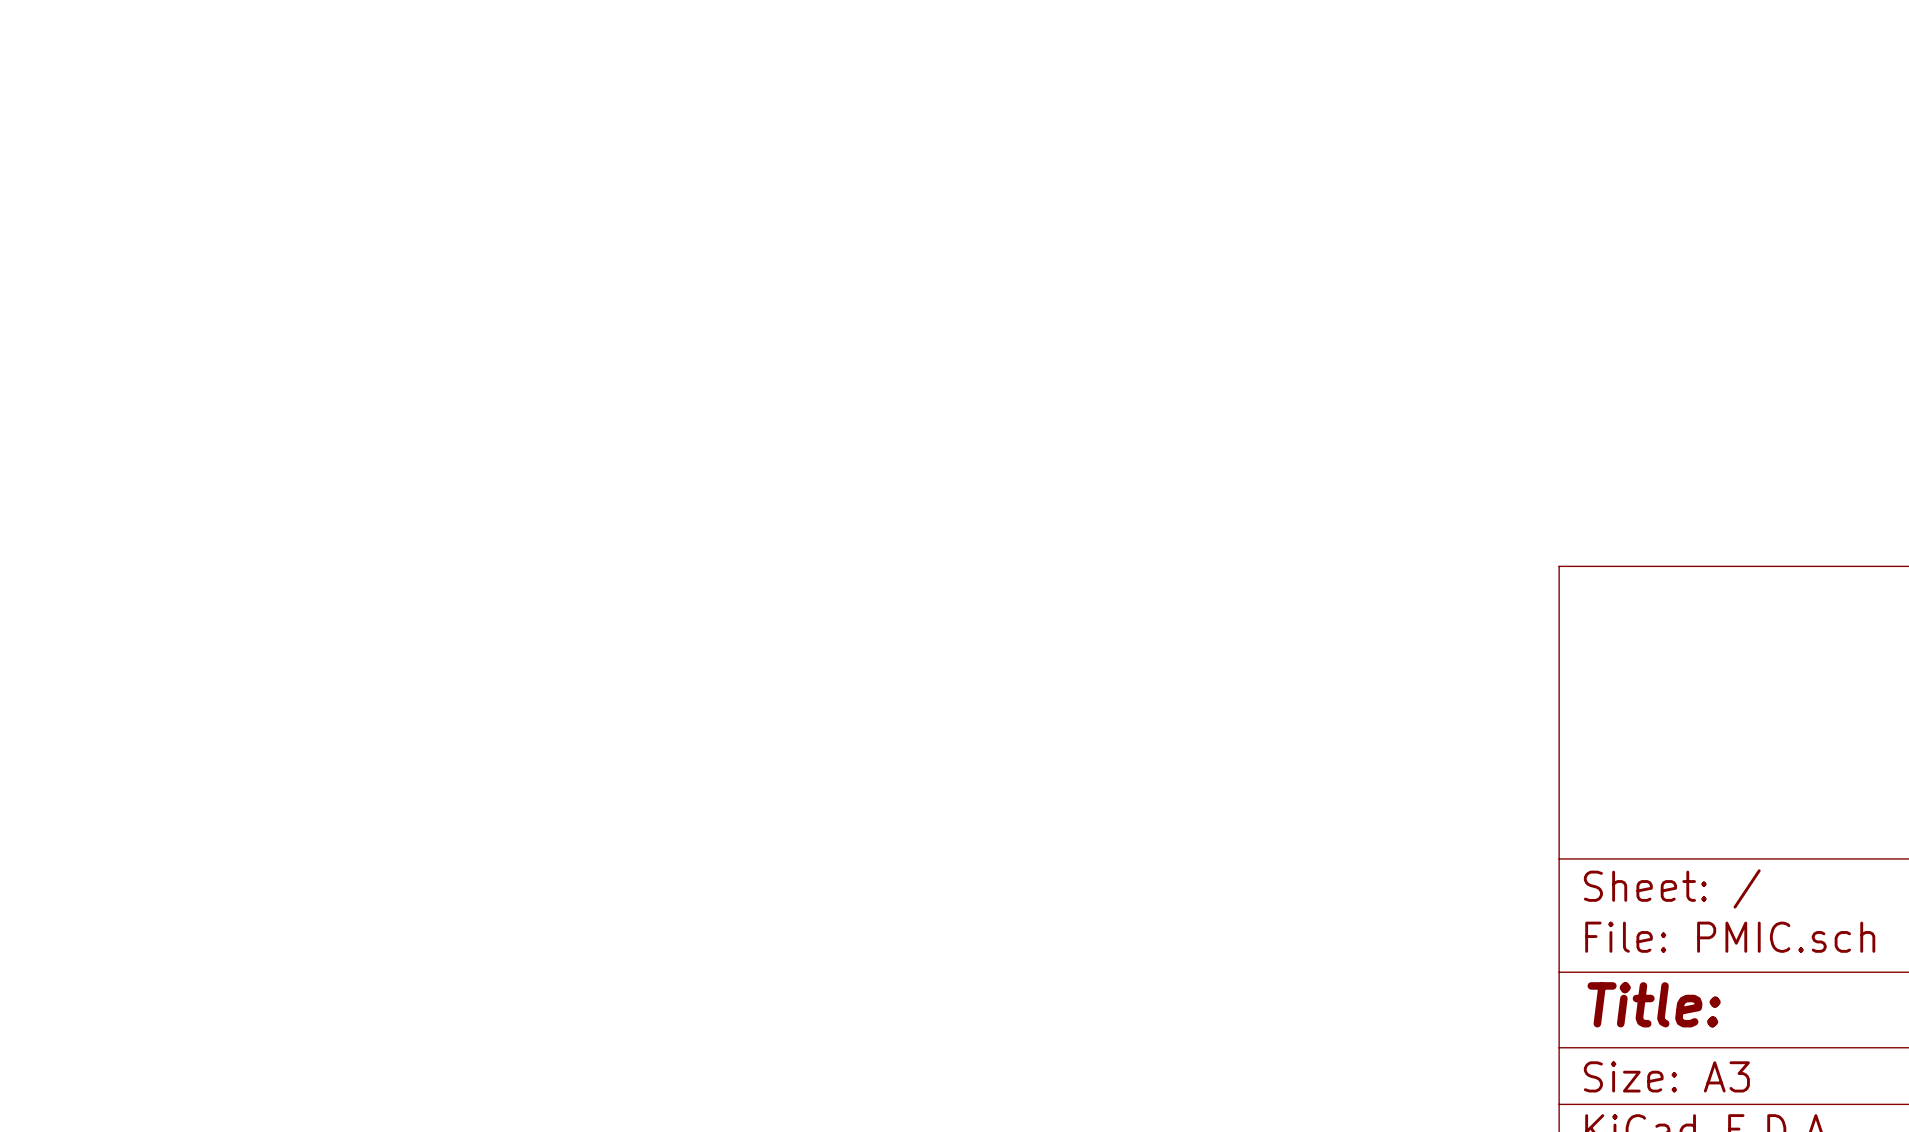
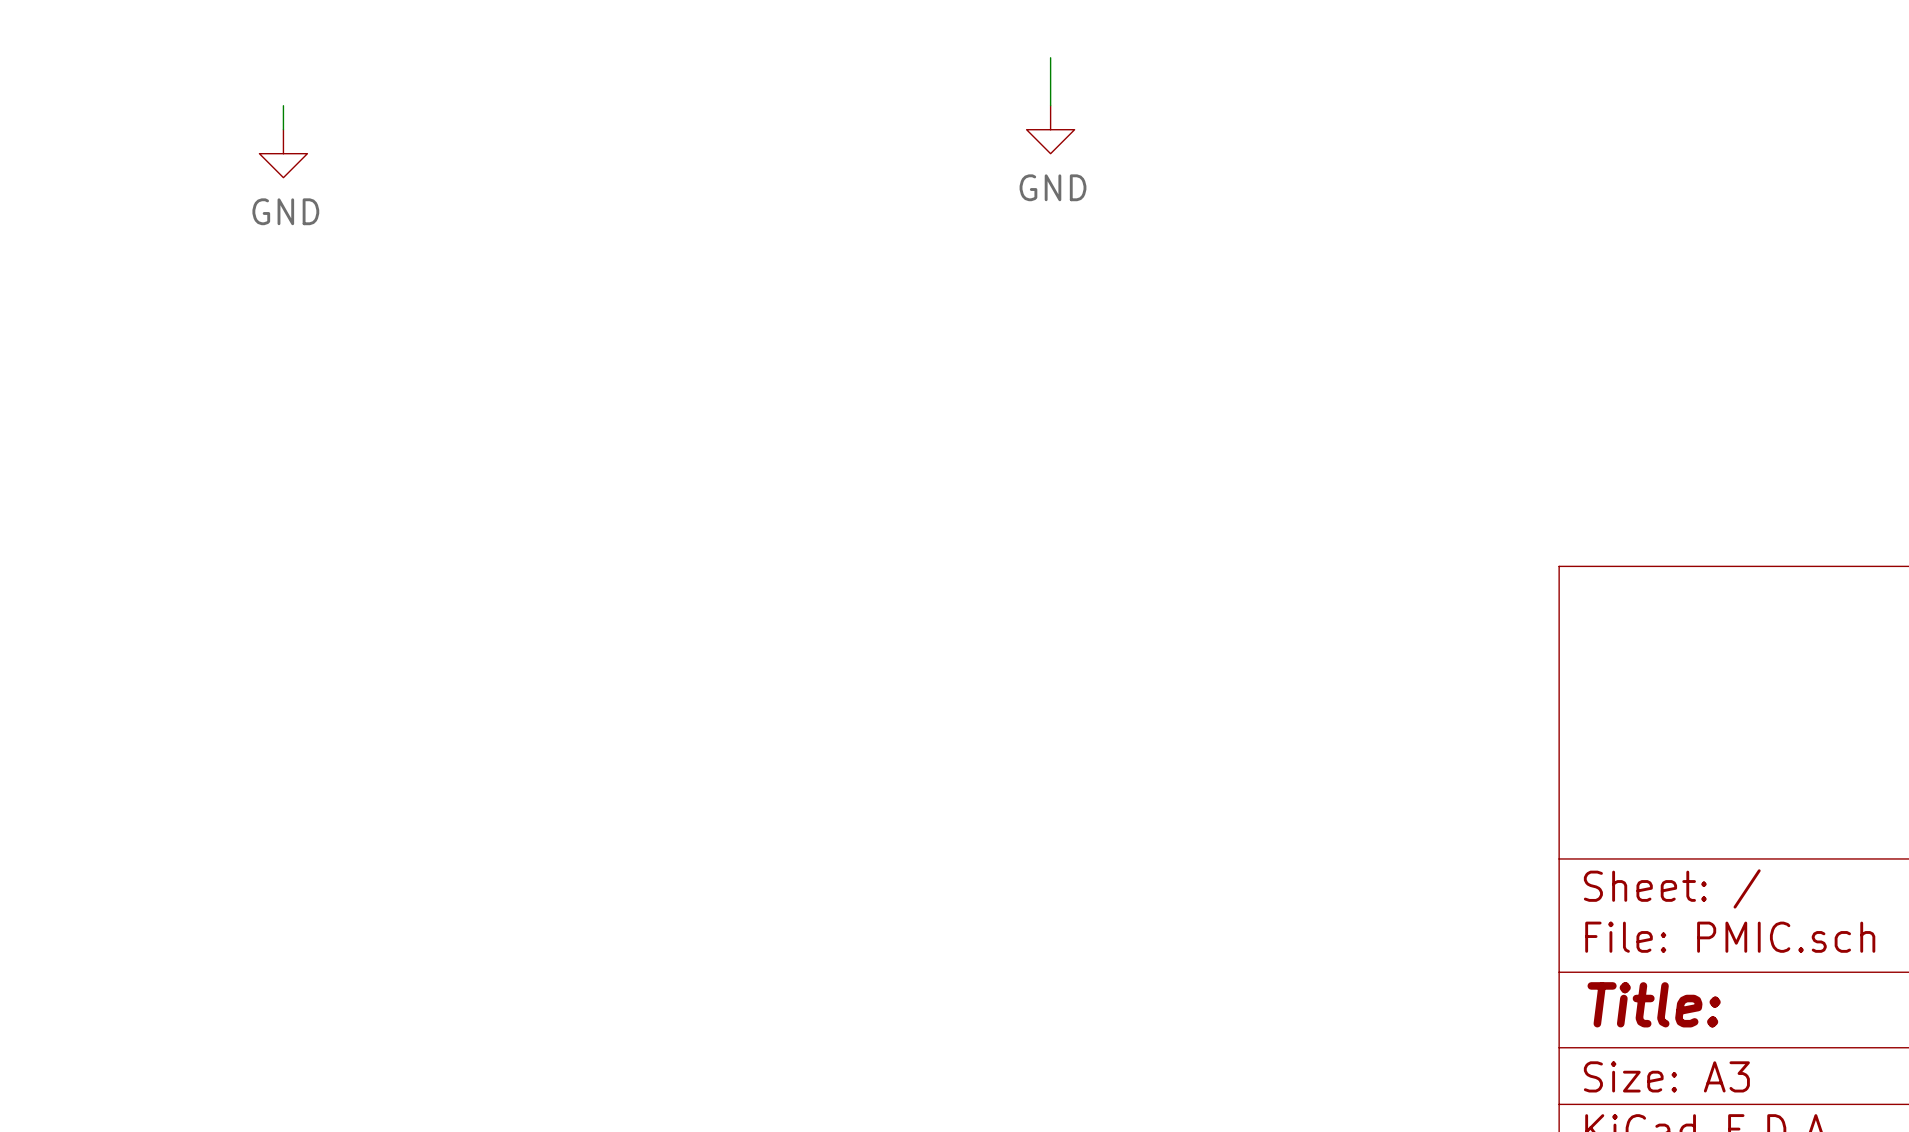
wire: none -> (1050, 57) (1050, 105)
wire: none -> (283, 105) (283, 129)
power symbol: none -> GND (1050, 129)
power symbol: none -> GND (283, 153)

